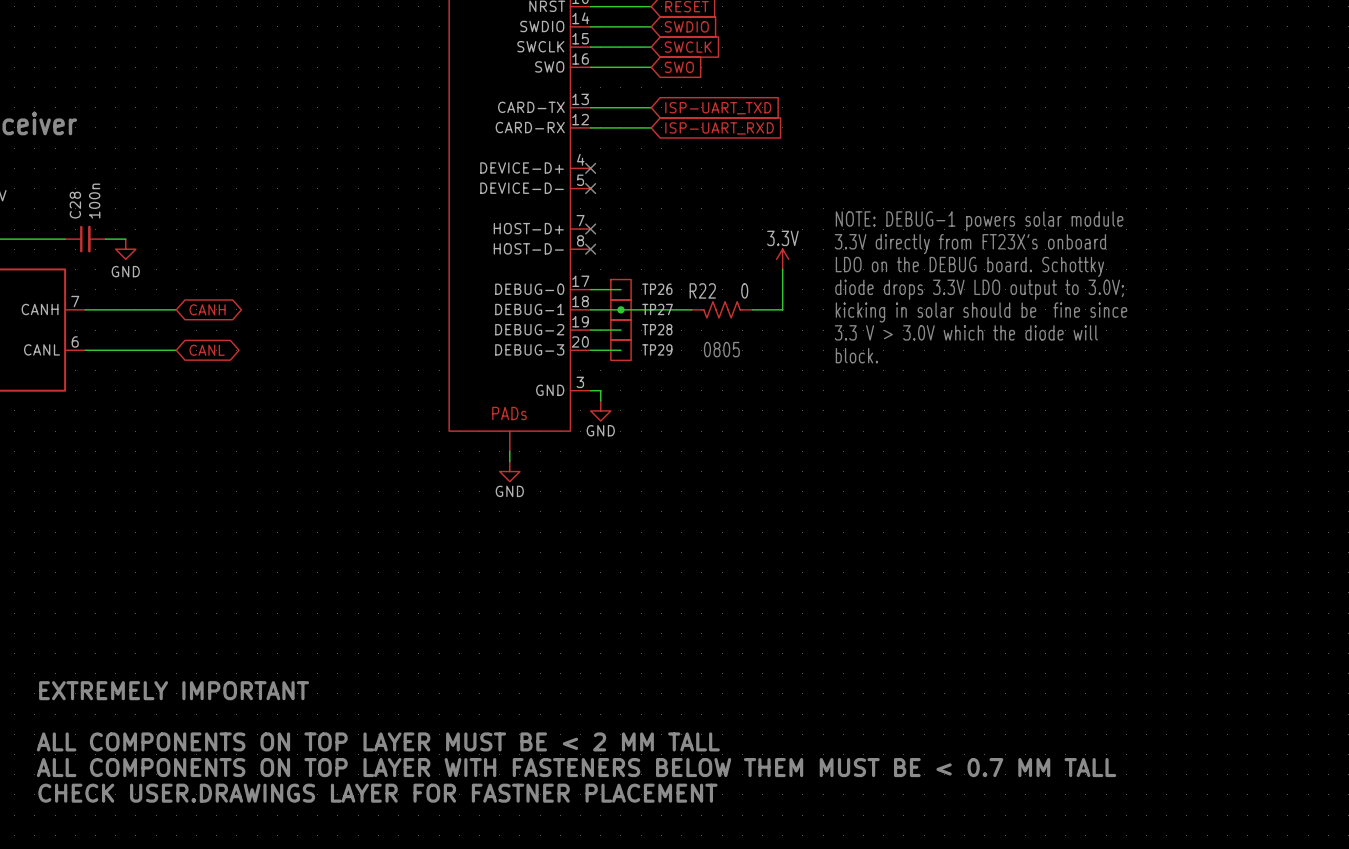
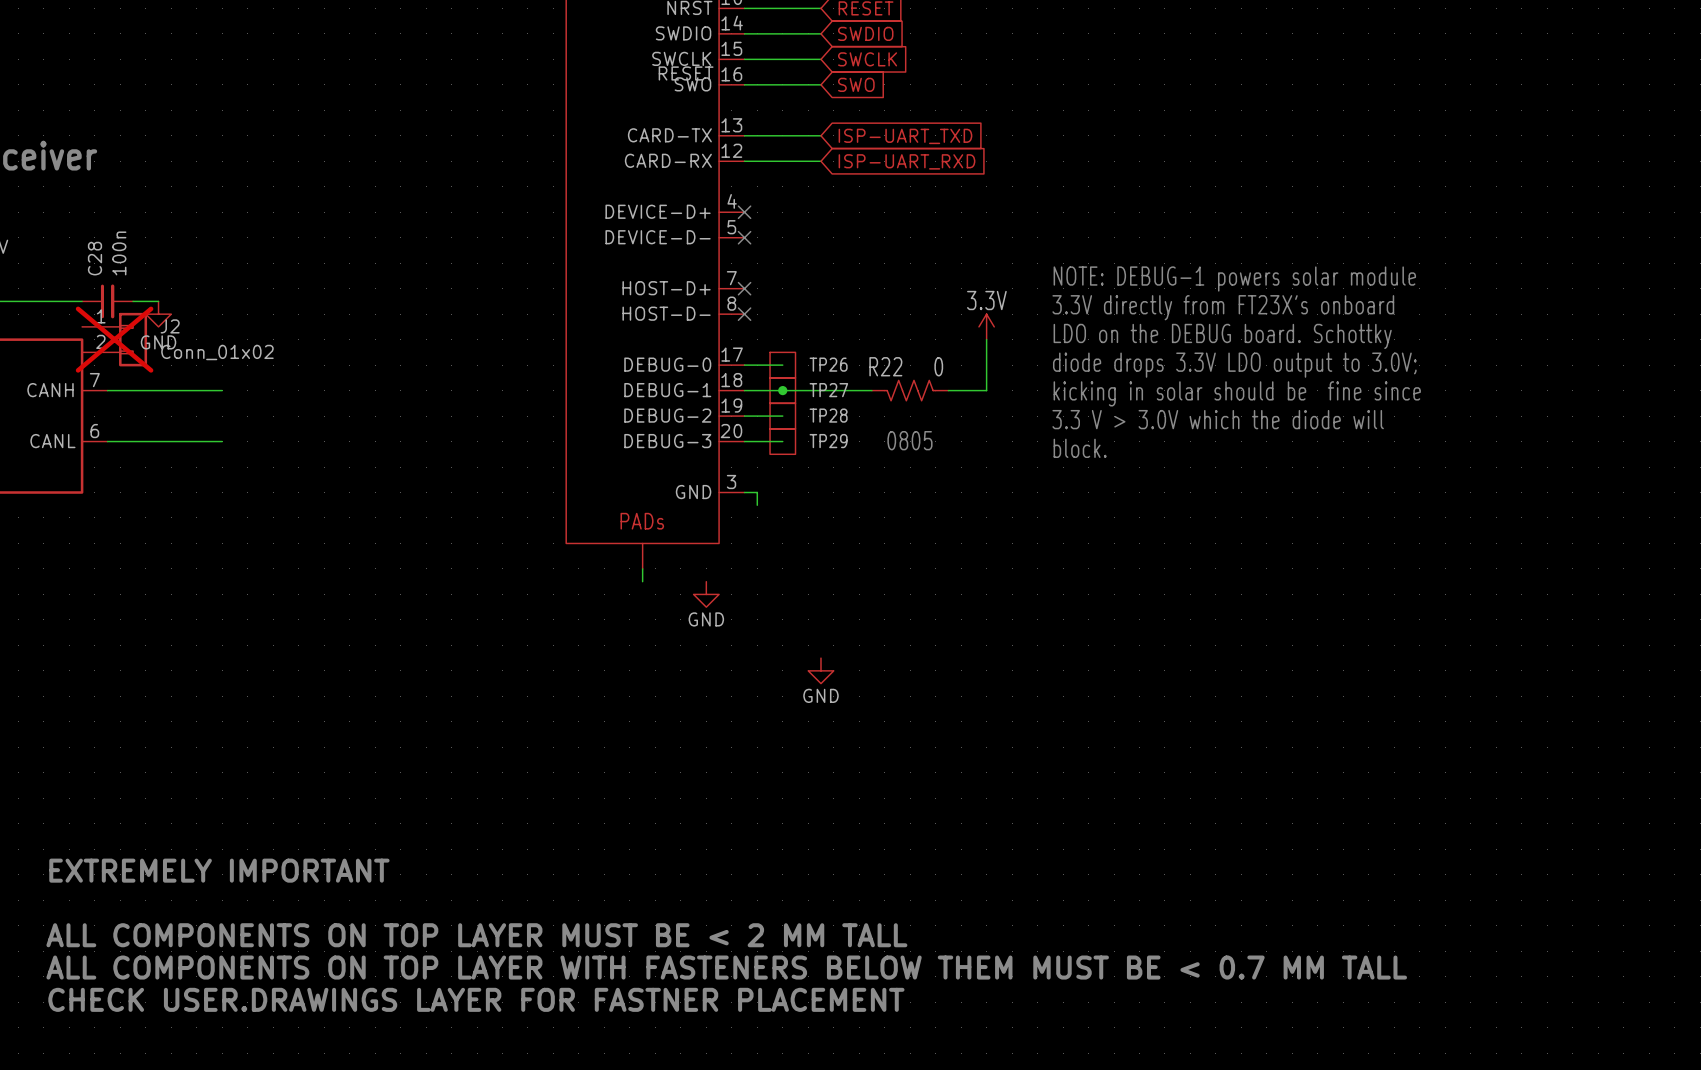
label: none -> RESET (686, 73)
J2: none -> Conn_01x02 (114, 339)
global label: CANH (207, 309) -> none
global label: CANL (207, 350) -> none
power symbol: GND (600, 410) -> none
power symbol: GND (509, 471) -> none
power symbol: none -> GND (706, 594)
power symbol: none -> GND (820, 670)

